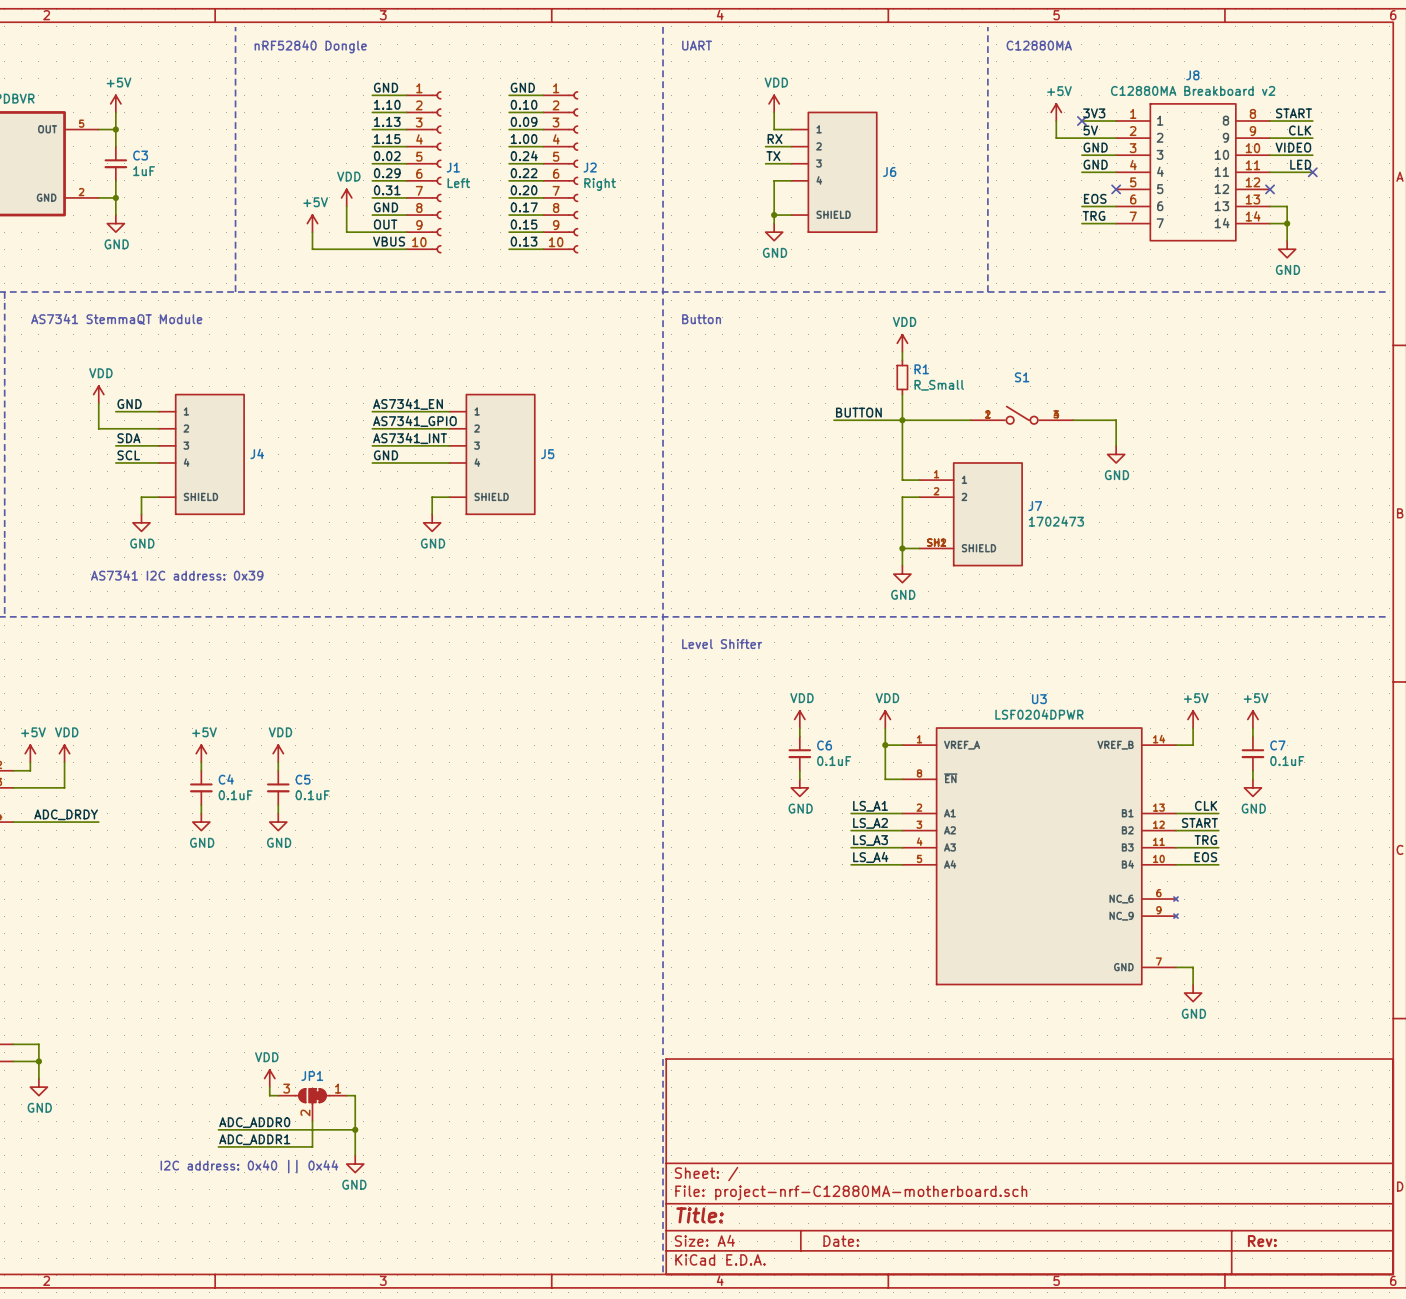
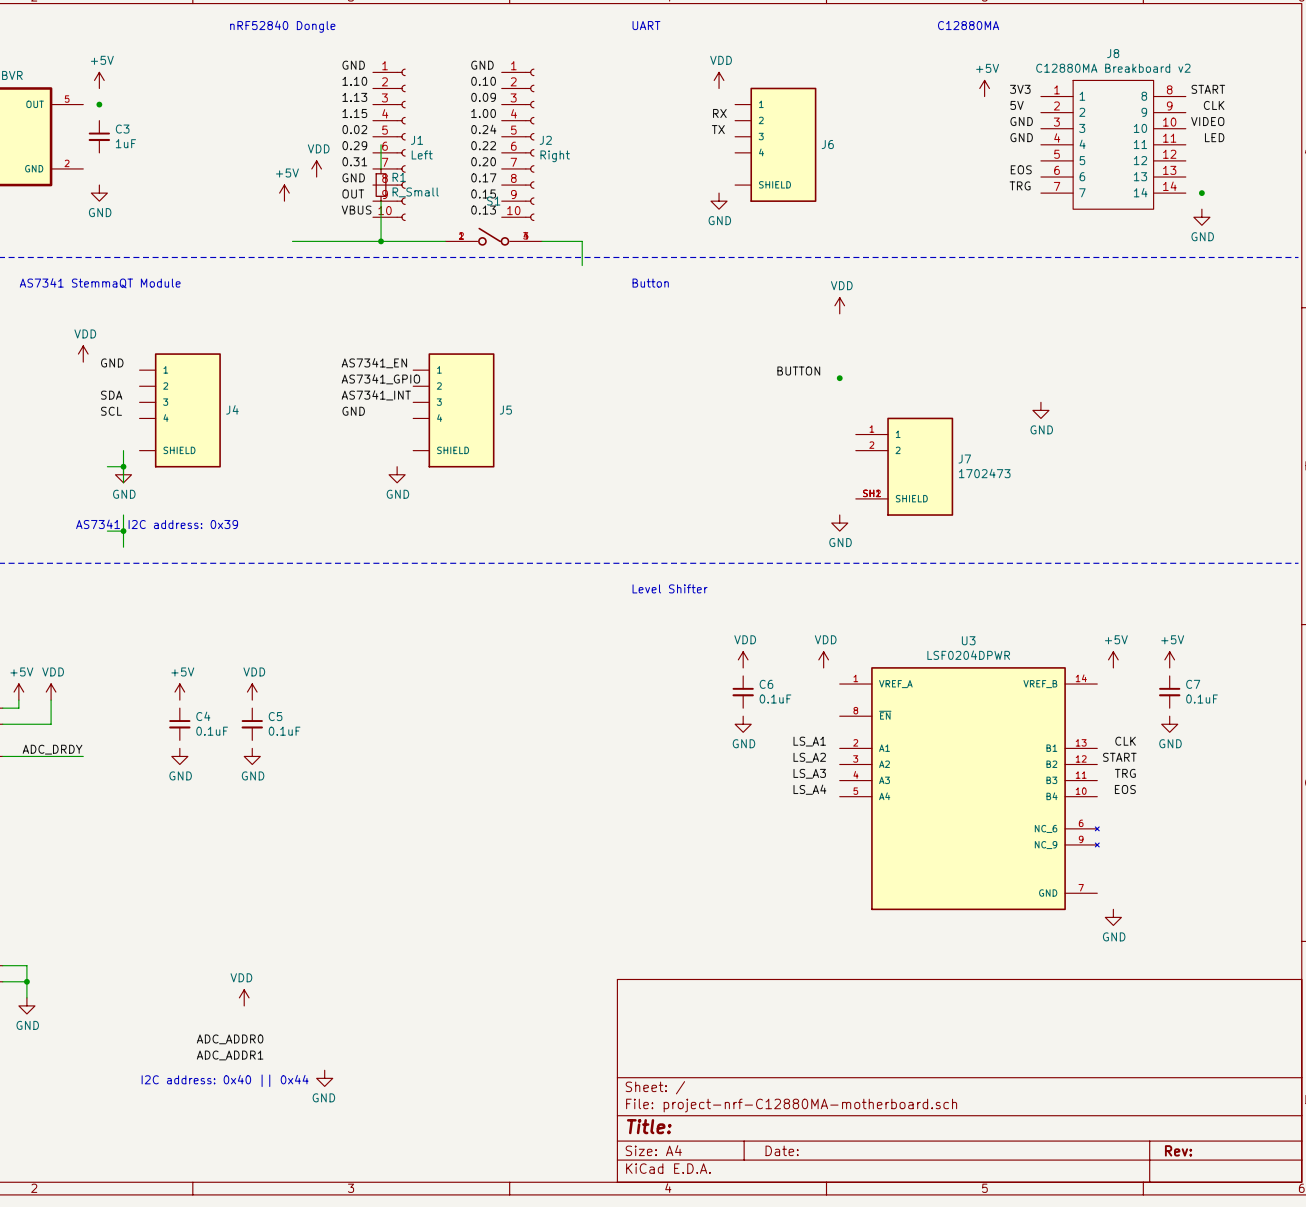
line: (235, 26) (235, 291) -> none
line: (663, 26) (663, 1275) -> none
line: (987, 26) (987, 291) -> none
wire: (372, 95) (406, 95) -> none
wire: (509, 95) (543, 95) -> none
wire: (115, 112) (115, 146) -> none
wire: (372, 112) (406, 112) -> none
wire: (509, 112) (543, 112) -> none
wire: (774, 112) (774, 129) (791, 129) -> none
wire: (1056, 121) (1056, 138) (1116, 138) -> none
wire: (1081, 121) (1116, 121) -> none
no-connect mark: (1081, 121) -> none
wire: (1270, 121) (1312, 121) -> none
wire: (98, 129) (115, 129) -> none
wire: (372, 129) (406, 129) -> none
wire: (509, 129) (543, 129) -> none
wire: (1270, 138) (1312, 138) -> none
wire: (372, 146) (406, 146) -> none
wire: (509, 146) (543, 146) -> none
wire: (765, 146) (791, 146) -> none
wire: (1081, 155) (1116, 155) -> none
wire: (1270, 155) (1312, 155) -> none
wire: (372, 163) (406, 163) -> none
wire: (509, 163) (543, 163) -> none
wire: (765, 163) (791, 163) -> none
wire: none -> (381, 144) (381, 168)
wire: (1081, 172) (1116, 172) -> none
wire: (1270, 172) (1312, 172) -> none
no-connect mark: (1312, 172) -> none
wire: (115, 180) (115, 215) -> none
wire: (372, 180) (406, 180) -> none
wire: (509, 180) (543, 180) -> none
wire: (791, 180) (774, 180) (774, 223) -> none
no-connect mark: (1116, 189) -> none
no-connect mark: (1270, 189) -> none
wire: (98, 197) (115, 197) -> none
junction: (115, 197) -> none
wire: (372, 197) (406, 197) -> none
wire: (509, 197) (543, 197) -> none
wire: (346, 206) (346, 232) (406, 232) -> none
wire: (1081, 206) (1116, 206) -> none
wire: (1270, 206) (1287, 206) (1287, 240) -> none
wire: (372, 215) (406, 215) -> none
wire: (509, 215) (543, 215) -> none
wire: (774, 215) (791, 215) -> none
junction: (774, 215) -> none
wire: (1081, 223) (1116, 223) -> none
wire: (1270, 223) (1287, 223) -> none
wire: (312, 232) (312, 249) (406, 249) -> none
wire: none -> (381, 201) (381, 241)
wire: (509, 232) (543, 232) -> none
wire: (509, 249) (543, 249) -> none
wire: none -> (292, 241) (445, 241)
junction: none -> (381, 241)
wire: none -> (541, 241) (582, 241) (582, 265)
wire: (902, 351) (902, 360) -> none
R1 position: (902, 377) -> (381, 185)
wire: (902, 394) (902, 480) (919, 480) -> none
wire: (98, 403) (98, 428) (158, 428) -> none
wire: (115, 411) (158, 411) -> none
wire: (372, 411) (449, 411) -> none
S1 position: (1022, 415) -> (493, 236)
wire: (834, 420) (970, 420) -> none
wire: (1073, 420) (1116, 420) (1116, 445) -> none
wire: (372, 428) (449, 428) -> none
wire: (115, 445) (158, 445) -> none
wire: (372, 445) (449, 445) -> none
wire: (115, 462) (158, 462) -> none
wire: (372, 462) (449, 462) -> none
wire: (141, 497) (158, 497) -> (107, 531) (123, 531)
wire: (449, 497) (432, 497) (432, 514) -> none
wire: (919, 497) (902, 497) (902, 565) -> none
wire: none -> (107, 466) (123, 466) (123, 482)
junction: none -> (123, 466)
wire: (902, 548) (919, 548) -> none
junction: (902, 548) -> none
wire: none -> (123, 515) (123, 547)
junction: none -> (123, 531)
wire: (799, 728) (799, 736) -> none
wire: (885, 728) (885, 779) (902, 779) -> none
wire: (1193, 728) (1193, 745) (1175, 745) -> none
wire: (1252, 728) (1252, 736) -> none
wire: (885, 745) (902, 745) -> none
junction: (885, 745) -> none
wire: (201, 762) (201, 770) -> none
wire: (278, 762) (278, 770) -> none
wire: (799, 770) (799, 779) -> none
wire: (1252, 770) (1252, 779) -> none
wire: (201, 804) (201, 813) -> none
wire: (278, 804) (278, 813) -> none
wire: (851, 813) (902, 813) -> none
wire: (1175, 813) (1218, 813) -> none
wire: (851, 830) (902, 830) -> none
wire: (1175, 830) (1218, 830) -> none
wire: (851, 847) (902, 847) -> none
wire: (1175, 847) (1218, 847) -> none
wire: (851, 864) (902, 864) -> none
wire: (1175, 864) (1218, 864) -> none
wire: (1175, 967) (1193, 967) (1193, 984) -> none
wire: (269, 1087) (269, 1095) (278, 1095) -> none
wire: (346, 1095) (355, 1095) (355, 1155) -> none
JP1: (312, 1105) -> none
wire: (312, 1121) (312, 1146) (218, 1146) -> none
wire: (218, 1129) (355, 1129) -> none
junction: (355, 1129) -> none

